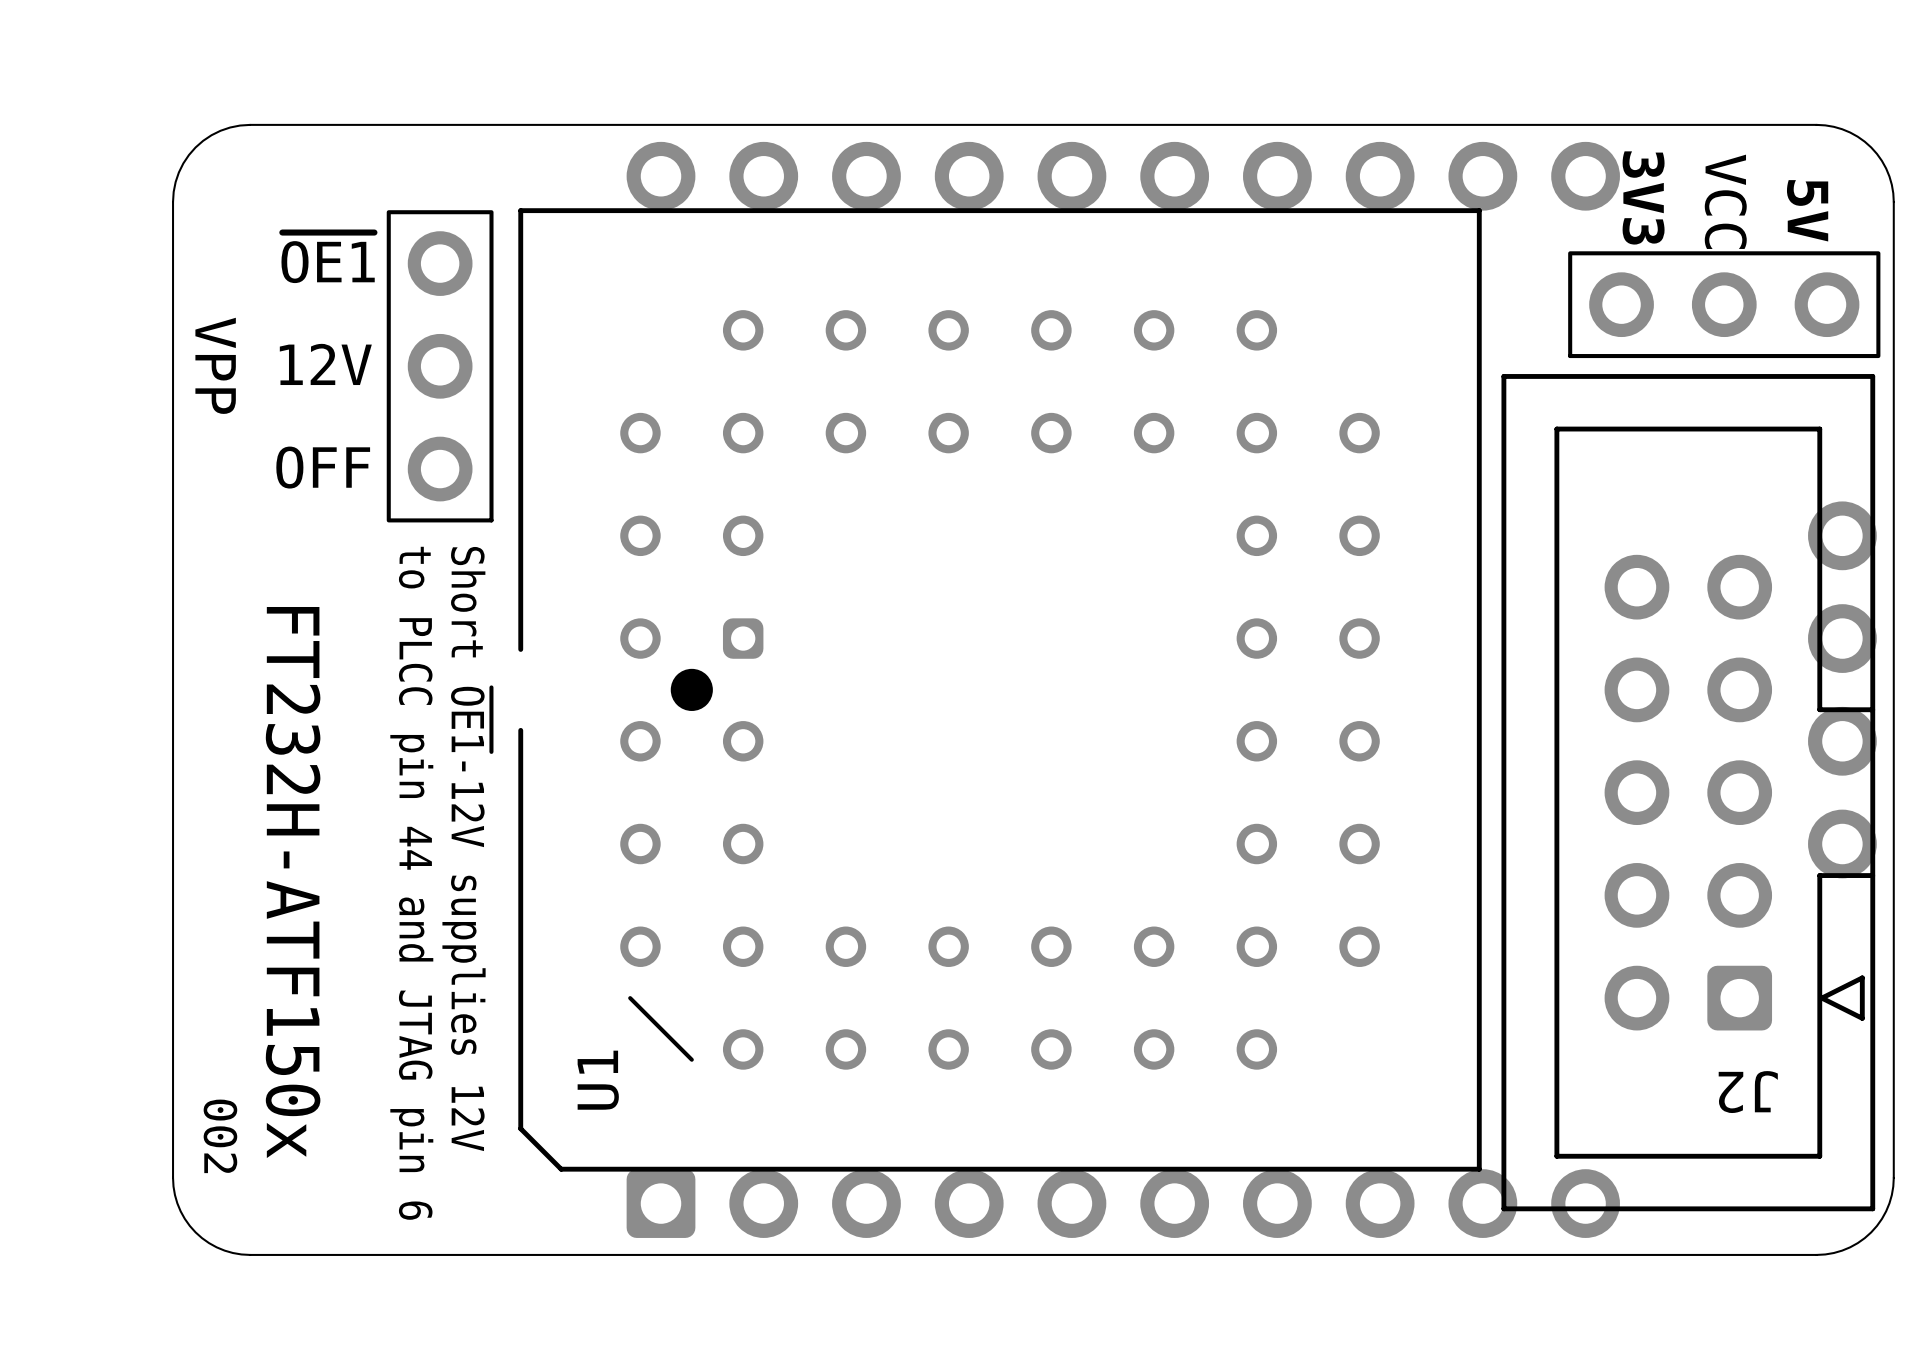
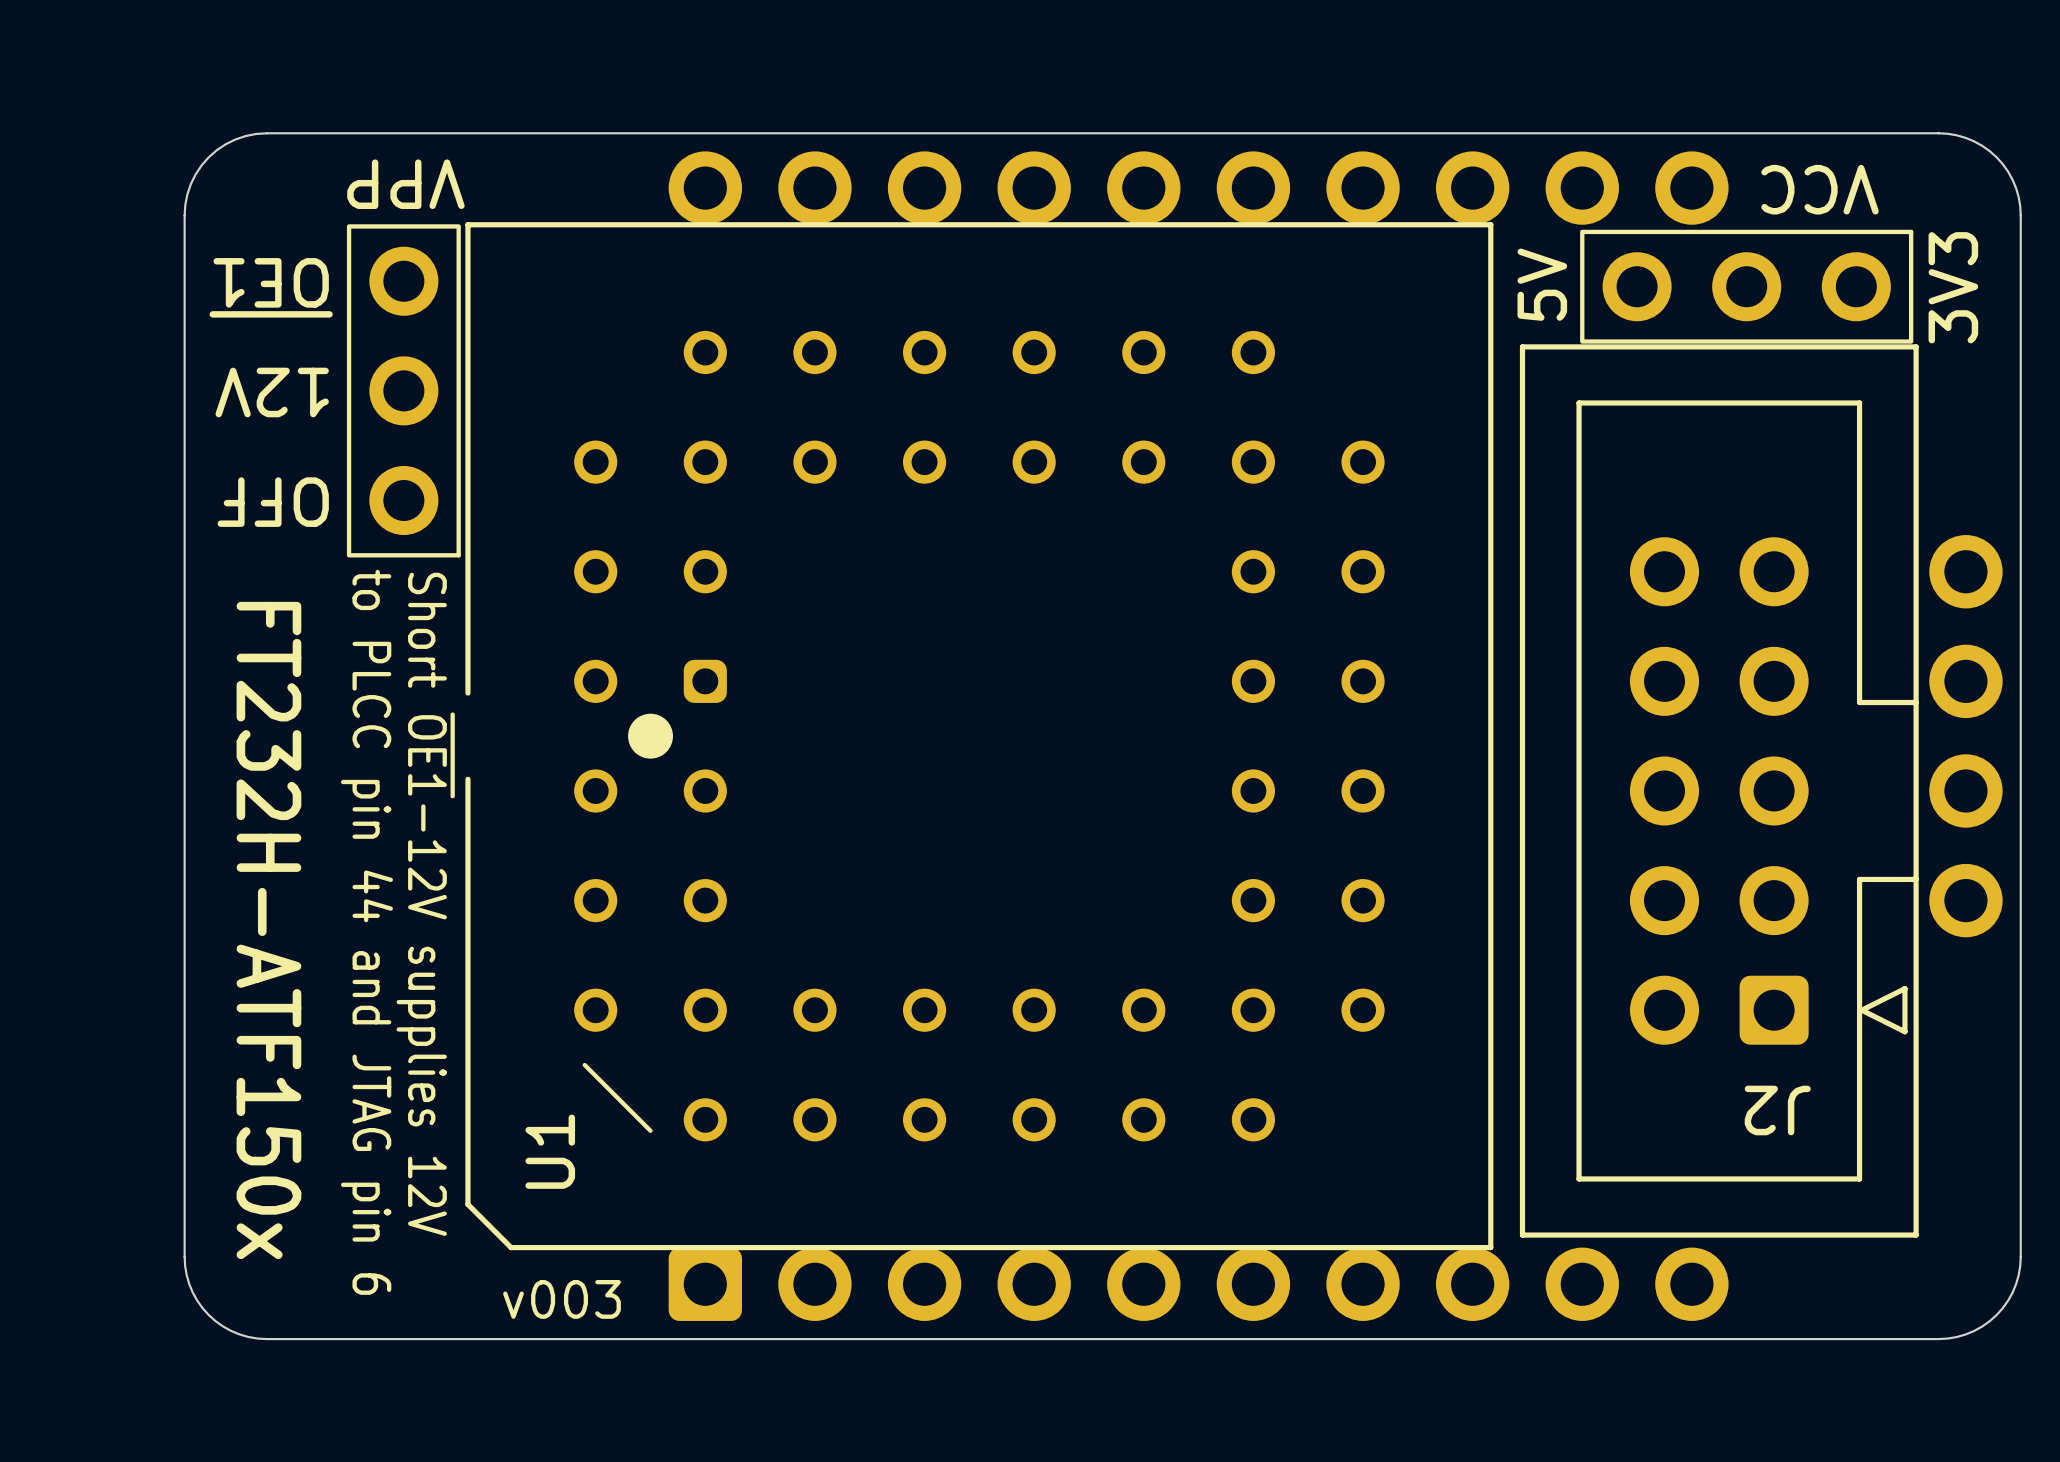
text rotation: 0° (1643, 197) -> 180° (1953, 287)
text position: 3V3 (1643, 197) -> 3V3 (1953, 287)
part value rotation: 0° (1725, 201) -> 90° clockwise (1820, 189)
text rotation: 0° (1807, 210) -> 180° (1542, 284)
text position: 5V (1807, 210) -> 5V (1542, 284)
text rotation: 0° (328, 257) -> 180° (271, 287)
part position: (1724, 304) -> (1746, 286)
text rotation: 0° (325, 364) -> 180° (272, 392)
part value rotation: 0° (215, 365) -> 90° clockwise (405, 184)
part value position: VPP (215, 365) -> VPP (405, 184)
part position: (440, 366) -> (403, 390)
text rotation: 0° (323, 467) -> 180° (273, 502)
U1 position: (1000, 689) -> (979, 736)
J2 position: (1688, 792) -> (1719, 790)
text position: Short ~{OE1}-12V supplies 12V (466, 849) -> Short ~{OE1}-12V supplies 12V (425, 904)
text position: FT232H-ATF150x (293, 882) -> FT232H-ATF150x (268, 930)
text position: to PLCC pin 44 and JTAG pin 6 (411, 883) -> to PLCC pin 44 and JTAG pin 6 (366, 932)
text: 002 (220, 1136) -> none
text: none -> v003 (561, 1299)

